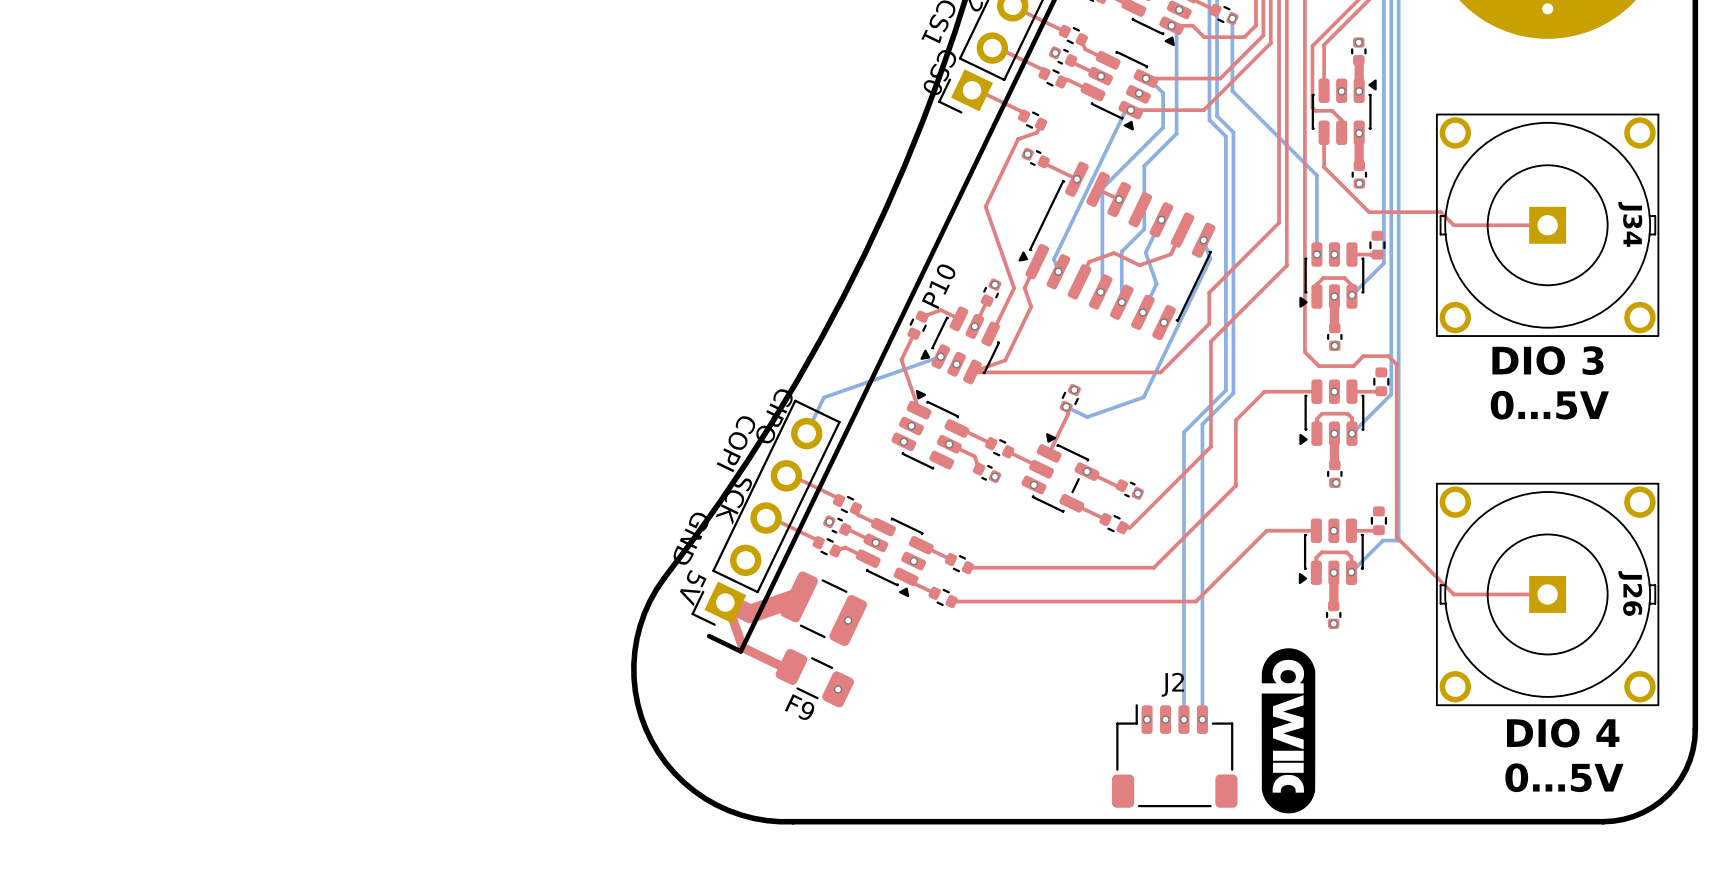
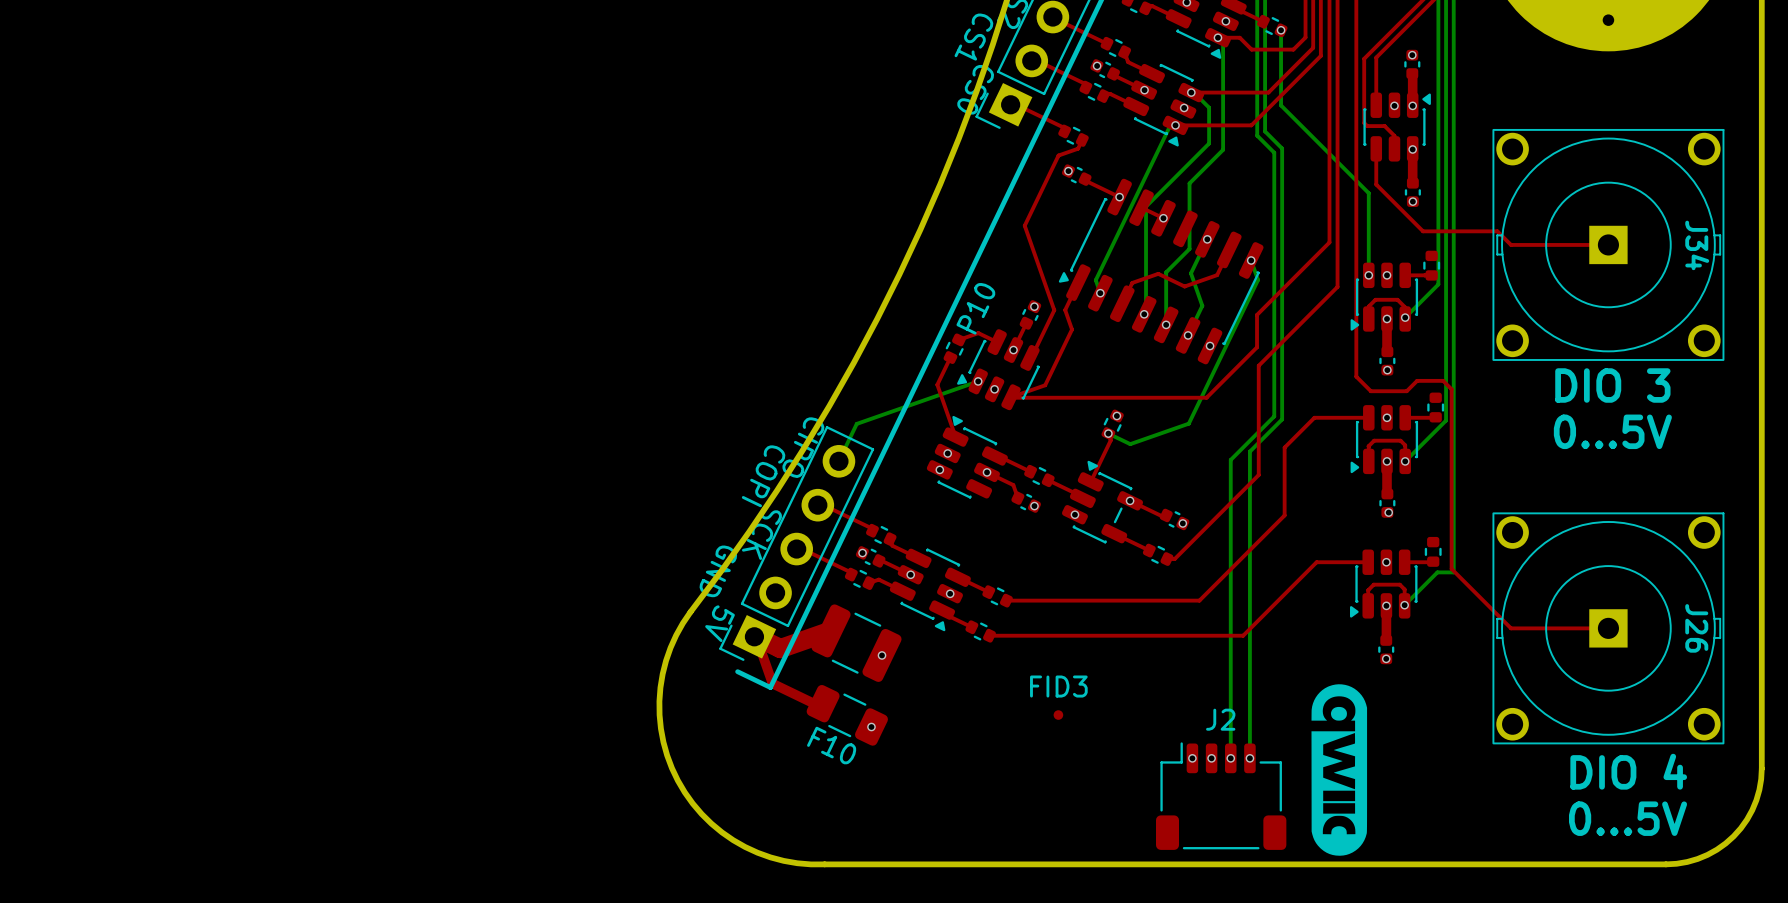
FID3: none -> (1058, 715)
F9 name: F9 (799, 707) -> F10 (831, 745)

